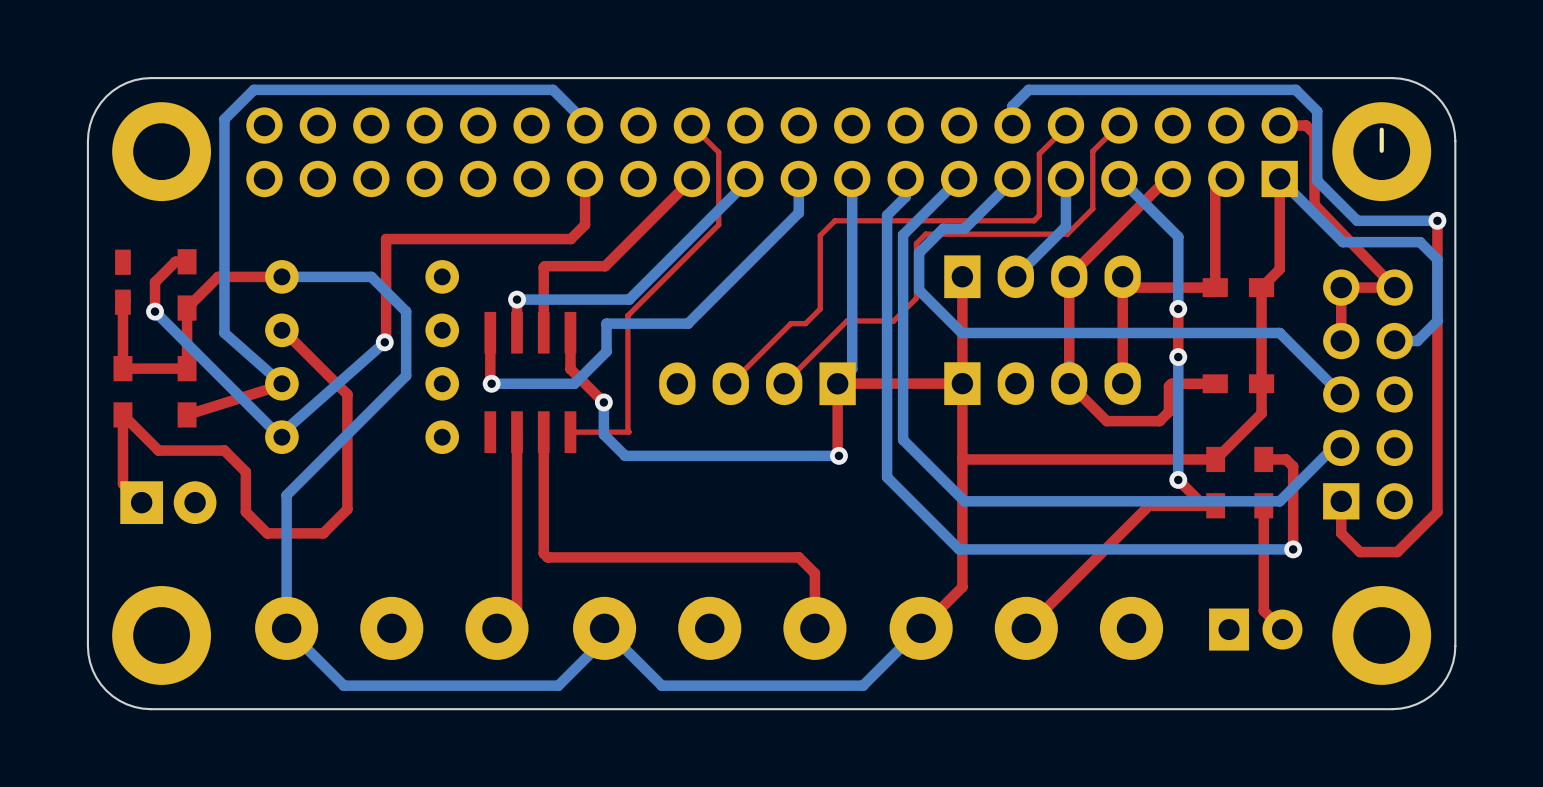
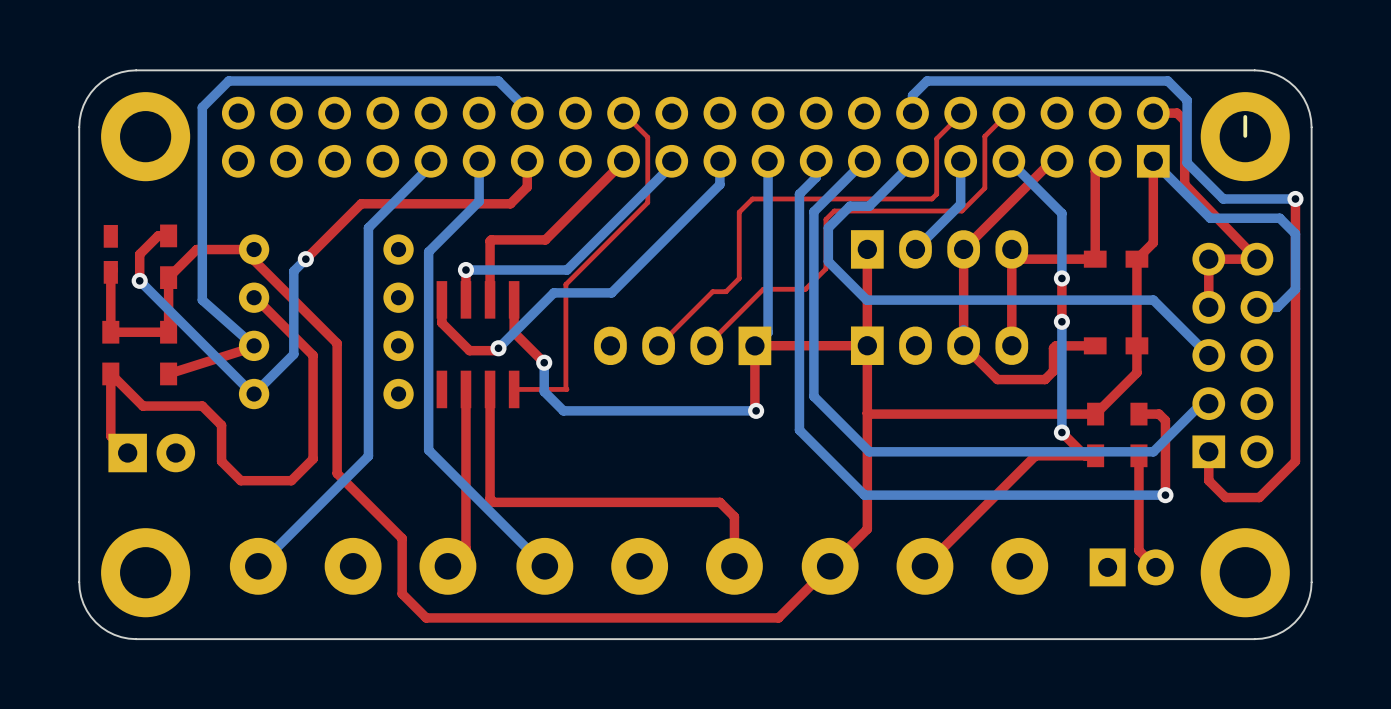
bottom track: none -> (430, 161) (430, 165) (368, 227) (368, 456) (258, 566)
bottom track: (798, 204) (798, 212) (688, 323) (606, 323) (606, 351) (574, 383) (491, 383) -> (719, 184) (611, 292) (553, 292) (498, 348)
top track: (585, 207) (585, 224) (570, 239) (386, 239) (384, 342) -> (527, 187) (510, 203) (361, 203) (305, 259)
top track: none -> (254, 249) (254, 260) (337, 343) (337, 473) (402, 538) (402, 593) (426, 617) (778, 617) (830, 566)
bottom track: (281, 276) (371, 276) (406, 311) (406, 375) (286, 495) (286, 628) (343, 685) (558, 685) (604, 639) -> none
bottom track: none -> (305, 259) (293, 271) (293, 354) (254, 394)
bottom track: (384, 342) (281, 433) -> none
via position: (384, 342) -> (305, 259)
top track: (490, 358) (491, 383) -> (441, 322) (469, 350) (496, 350) (498, 348)
via position: (491, 383) -> (498, 348)
bottom track: (920, 628) (863, 685) (661, 685) (604, 628) -> (479, 161) (479, 201) (428, 251) (428, 450) (544, 566)

